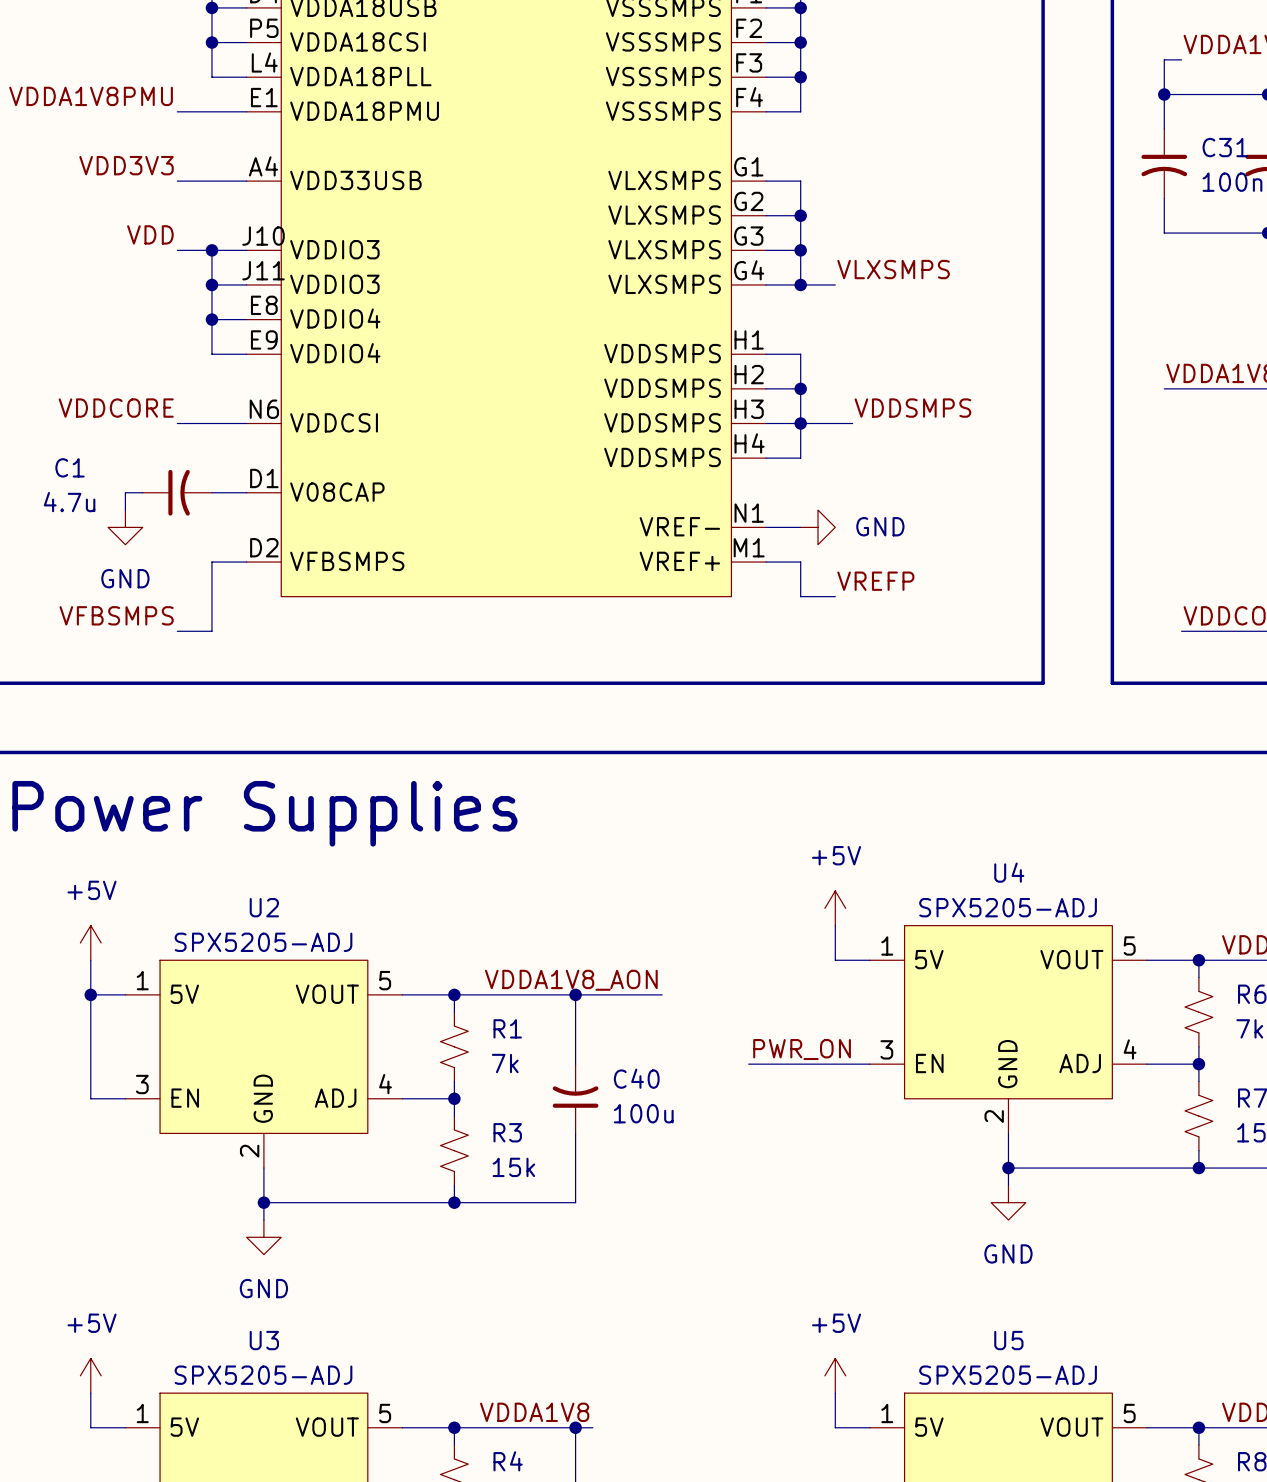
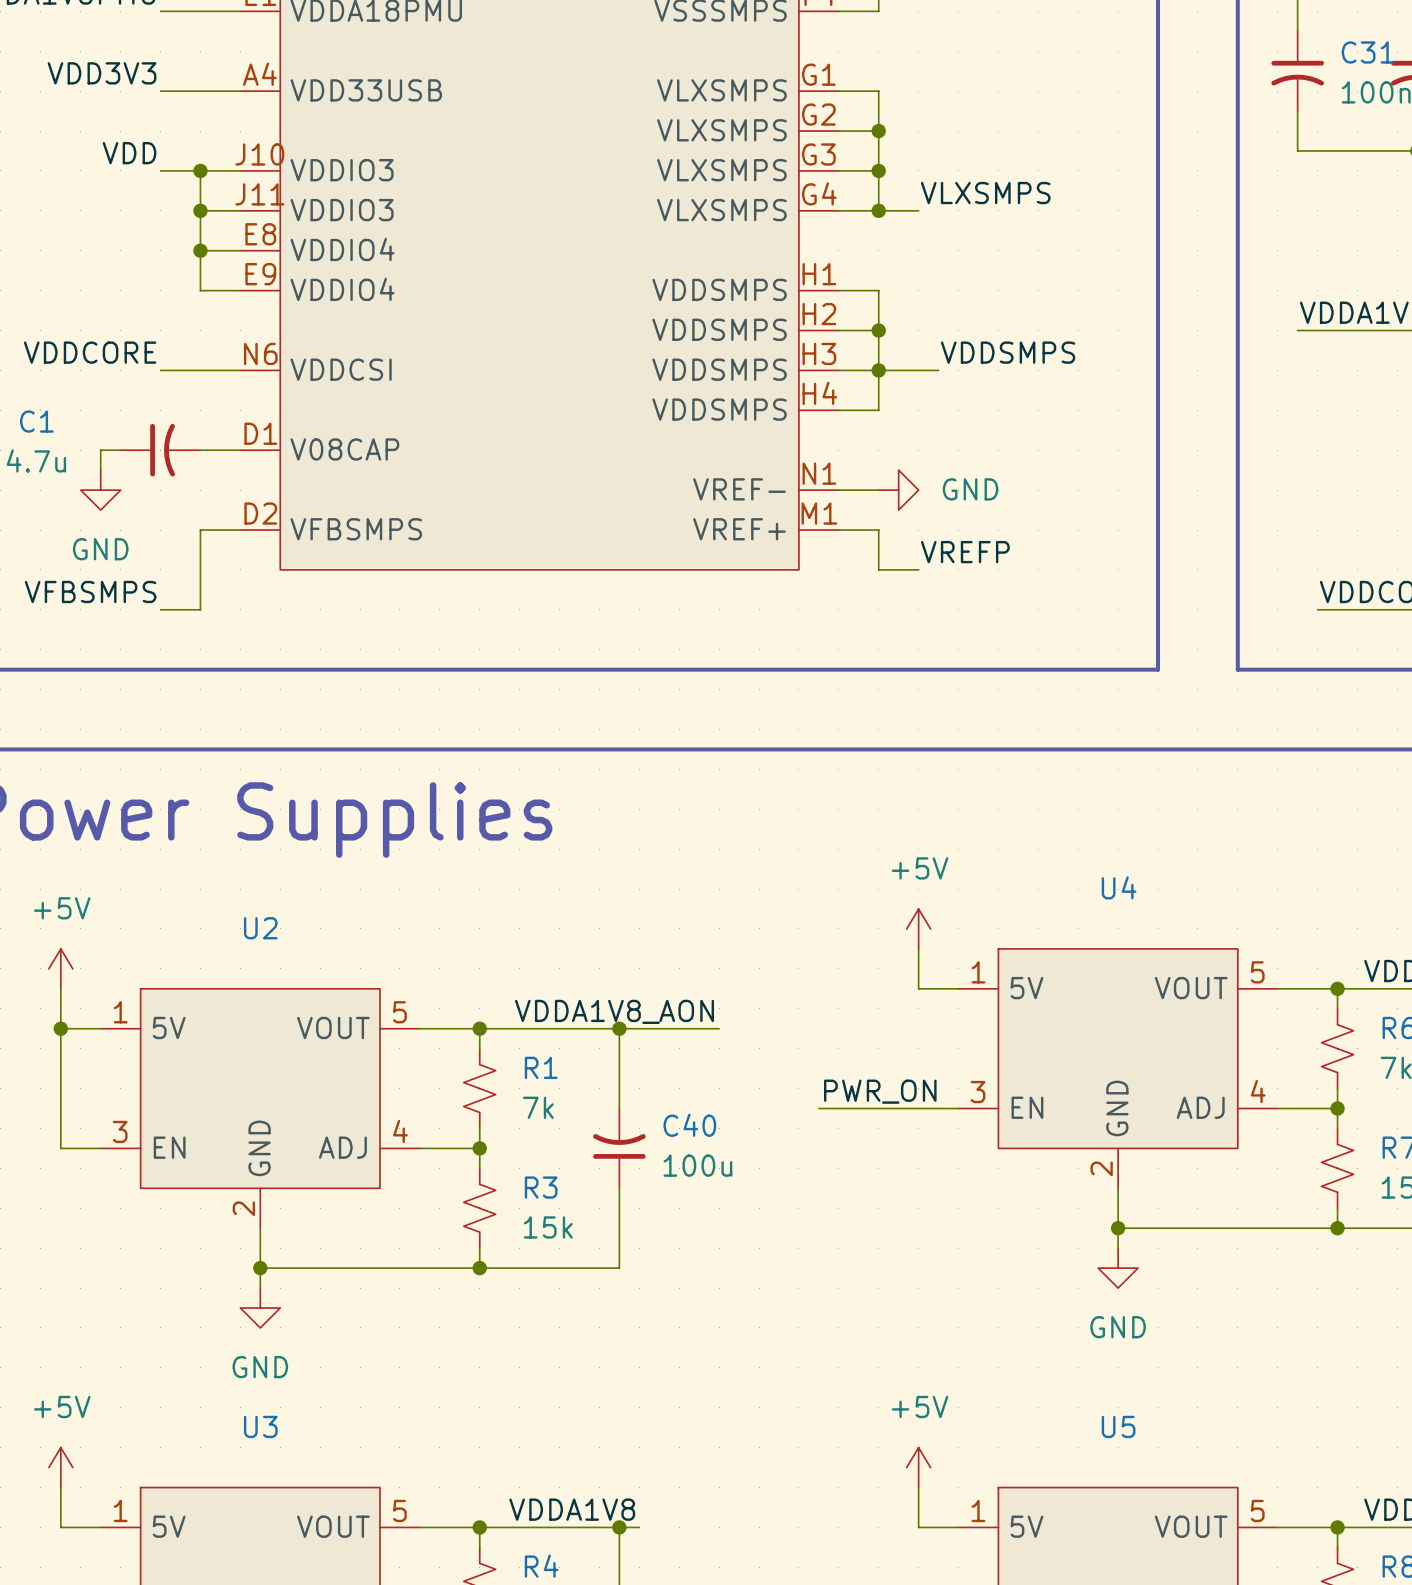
U4 value: SPX5205-ADJ (1008, 907) -> none
U2 value: SPX5205-ADJ (263, 942) -> none
U3 value: SPX5205-ADJ (263, 1375) -> none
U5 value: SPX5205-ADJ (1008, 1375) -> none

